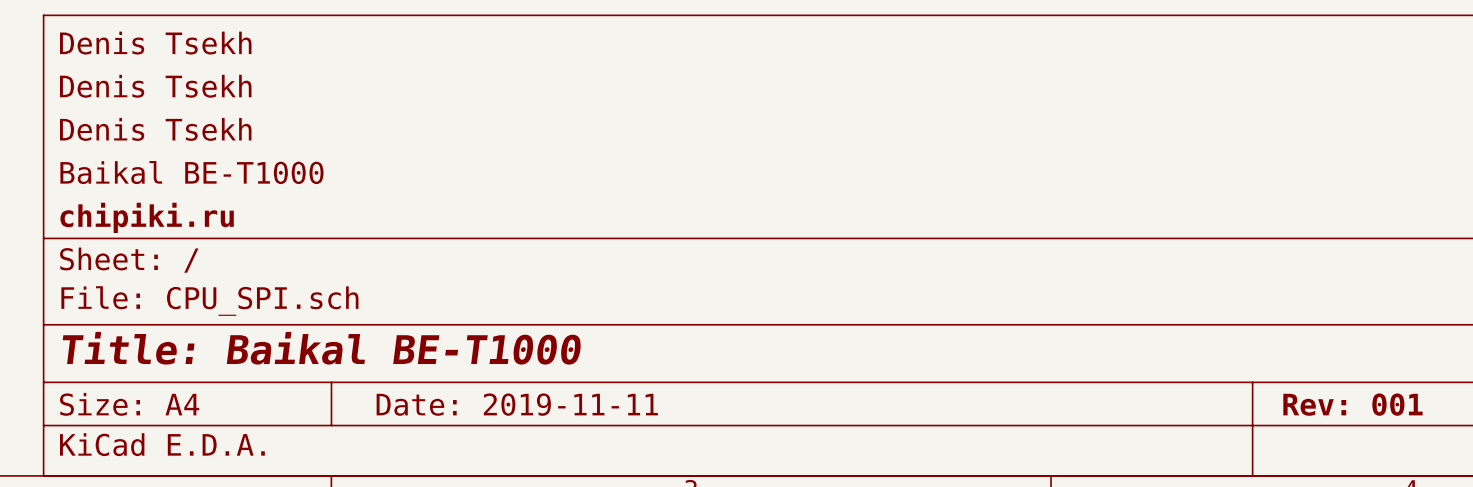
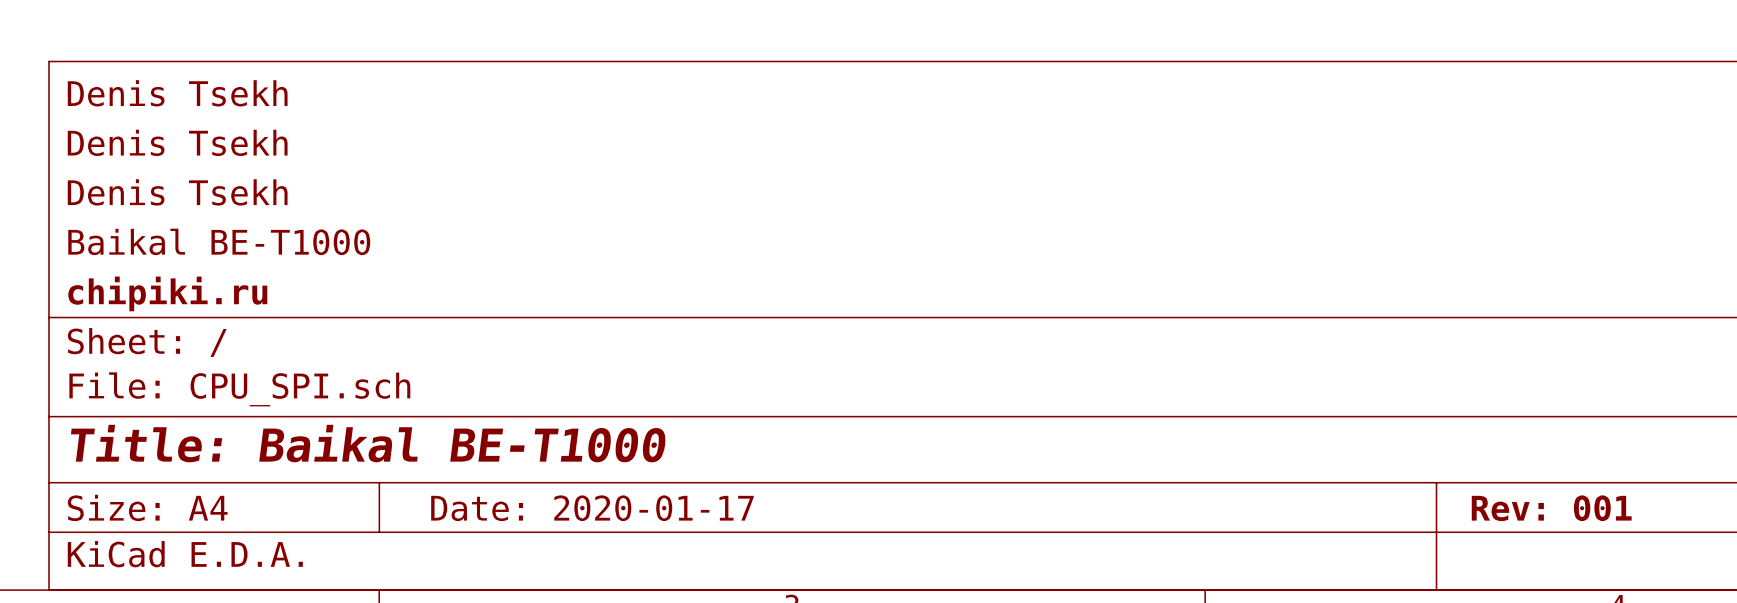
title block: Date: 2019-11-11 (517, 404) -> Date: 2020-01-17 (592, 508)

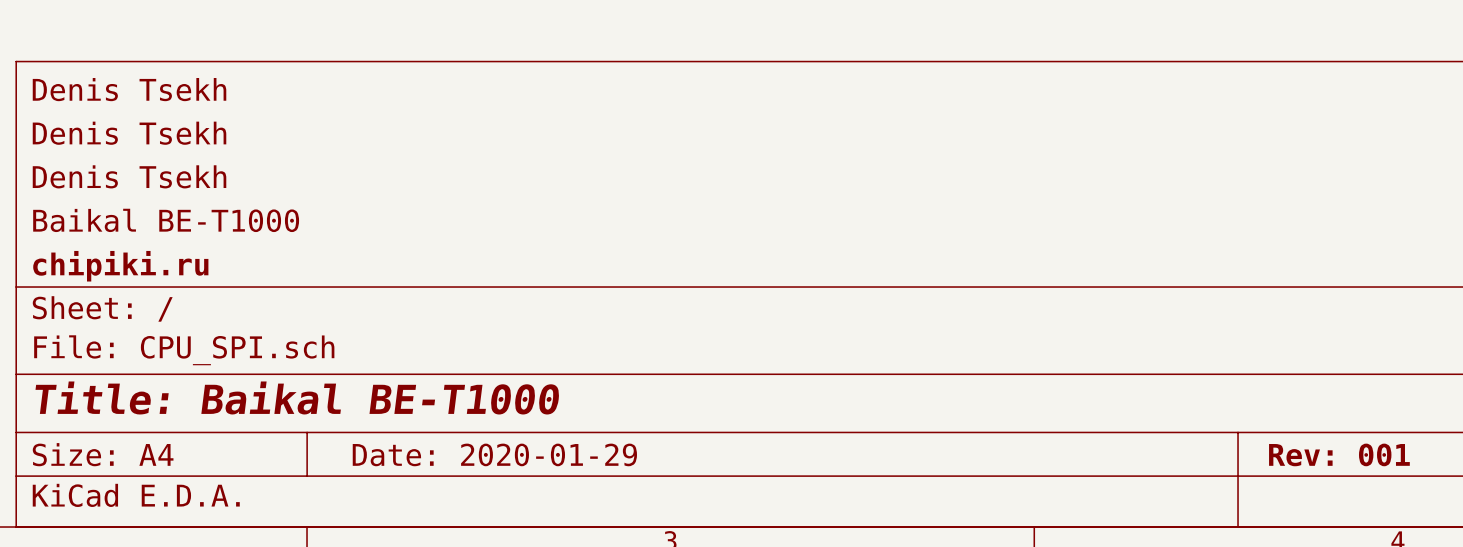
title block: Date: 2020-01-17 (592, 508) -> Date: 2020-01-29 (494, 454)

